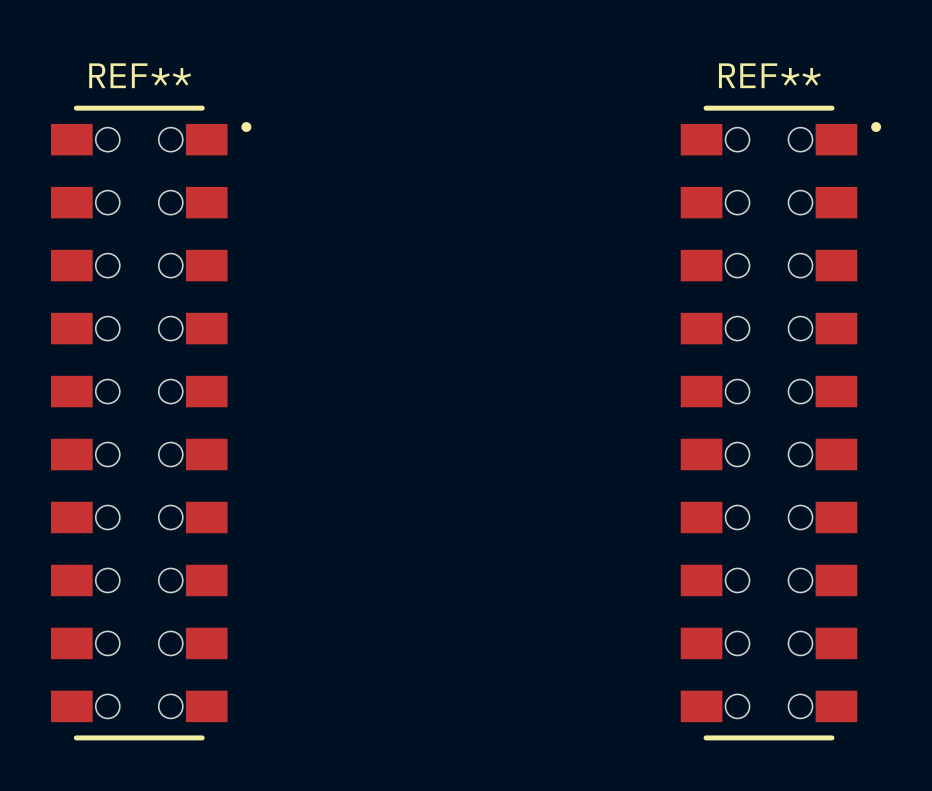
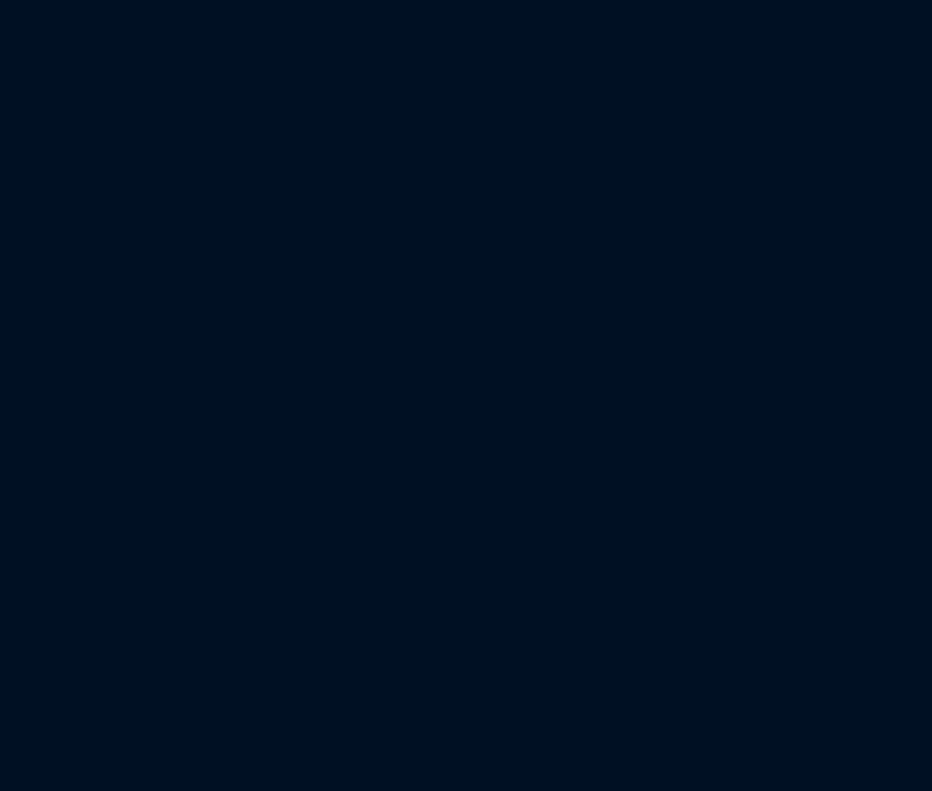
REF**: (151, 423) -> none
REF**: (780, 423) -> none

